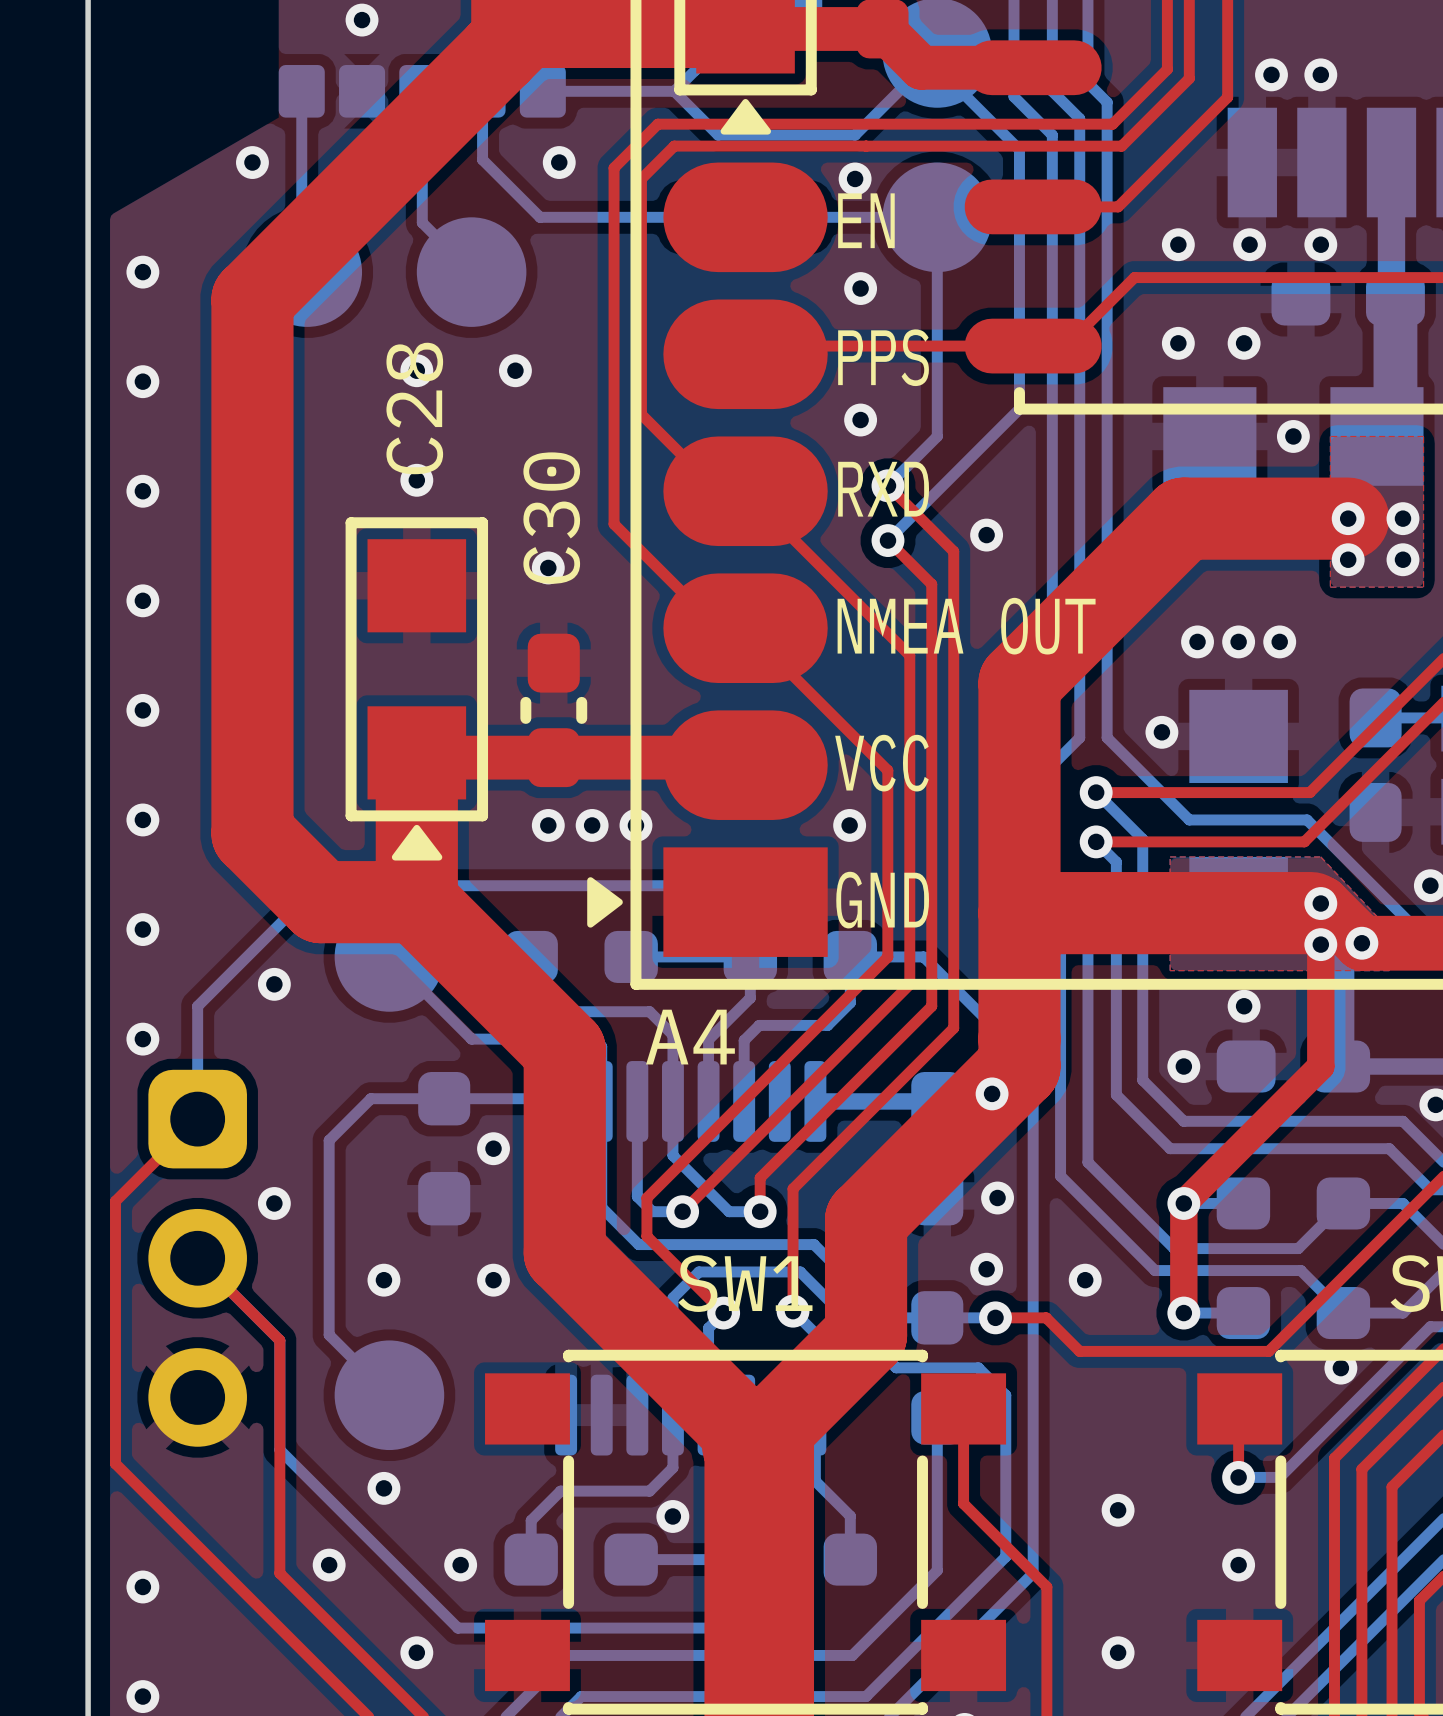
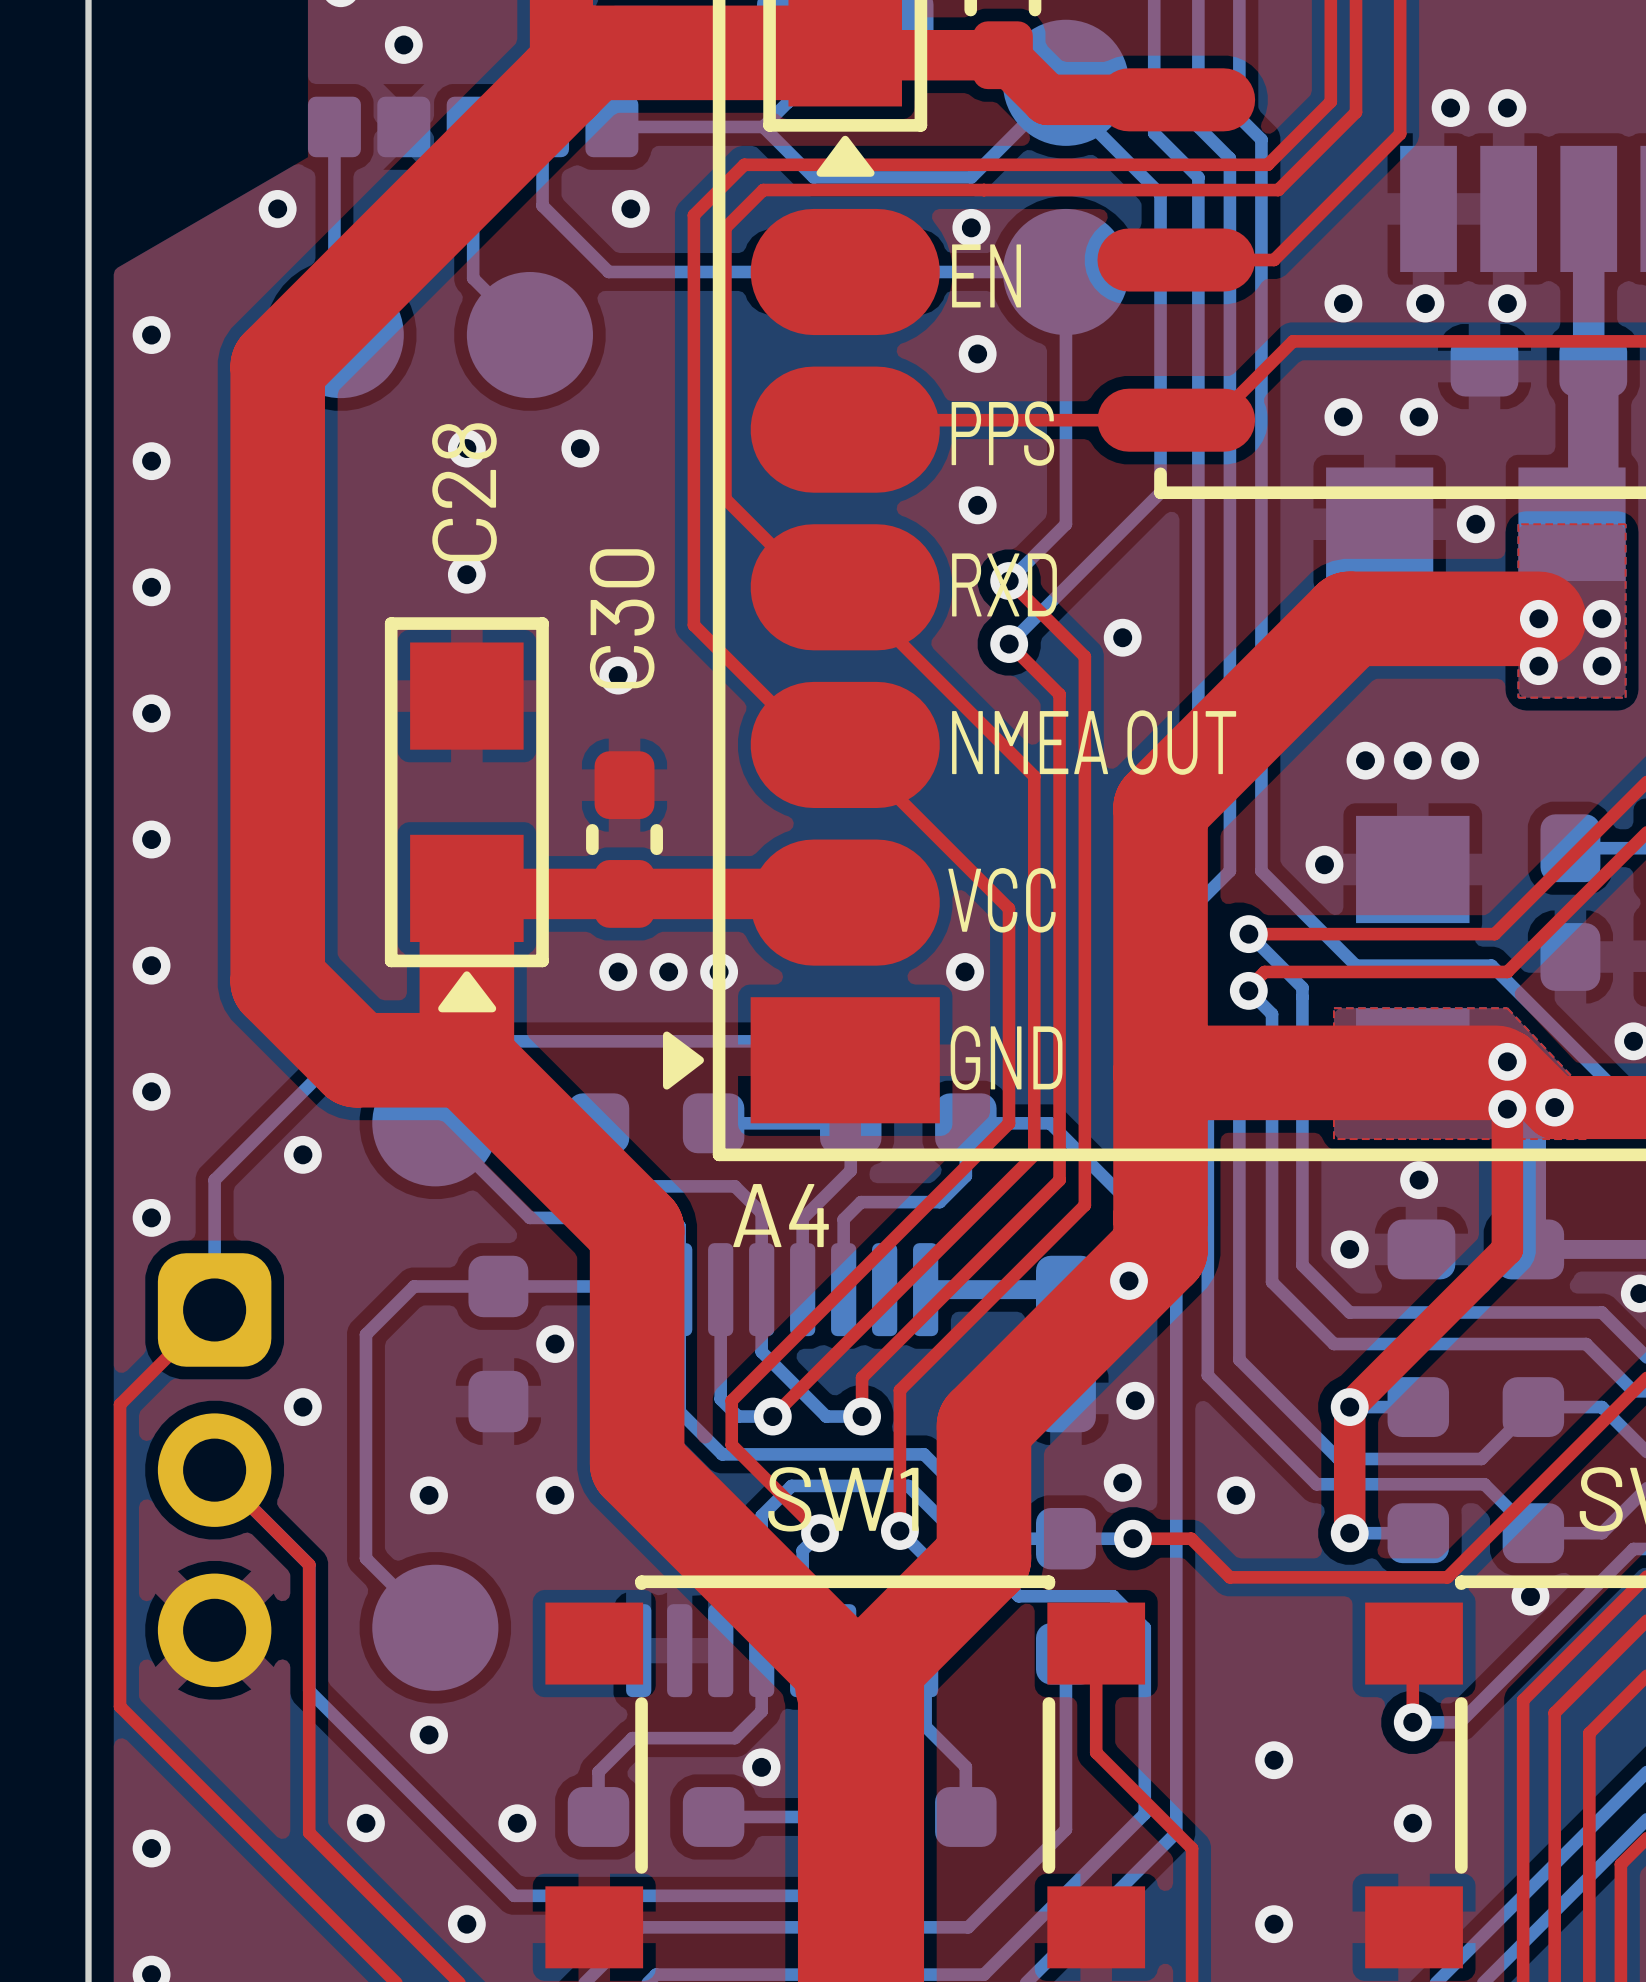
top track: (1320, 825) (1304, 841) (1096, 841) -> (1507, 971) (1264, 971) (1239, 997)

